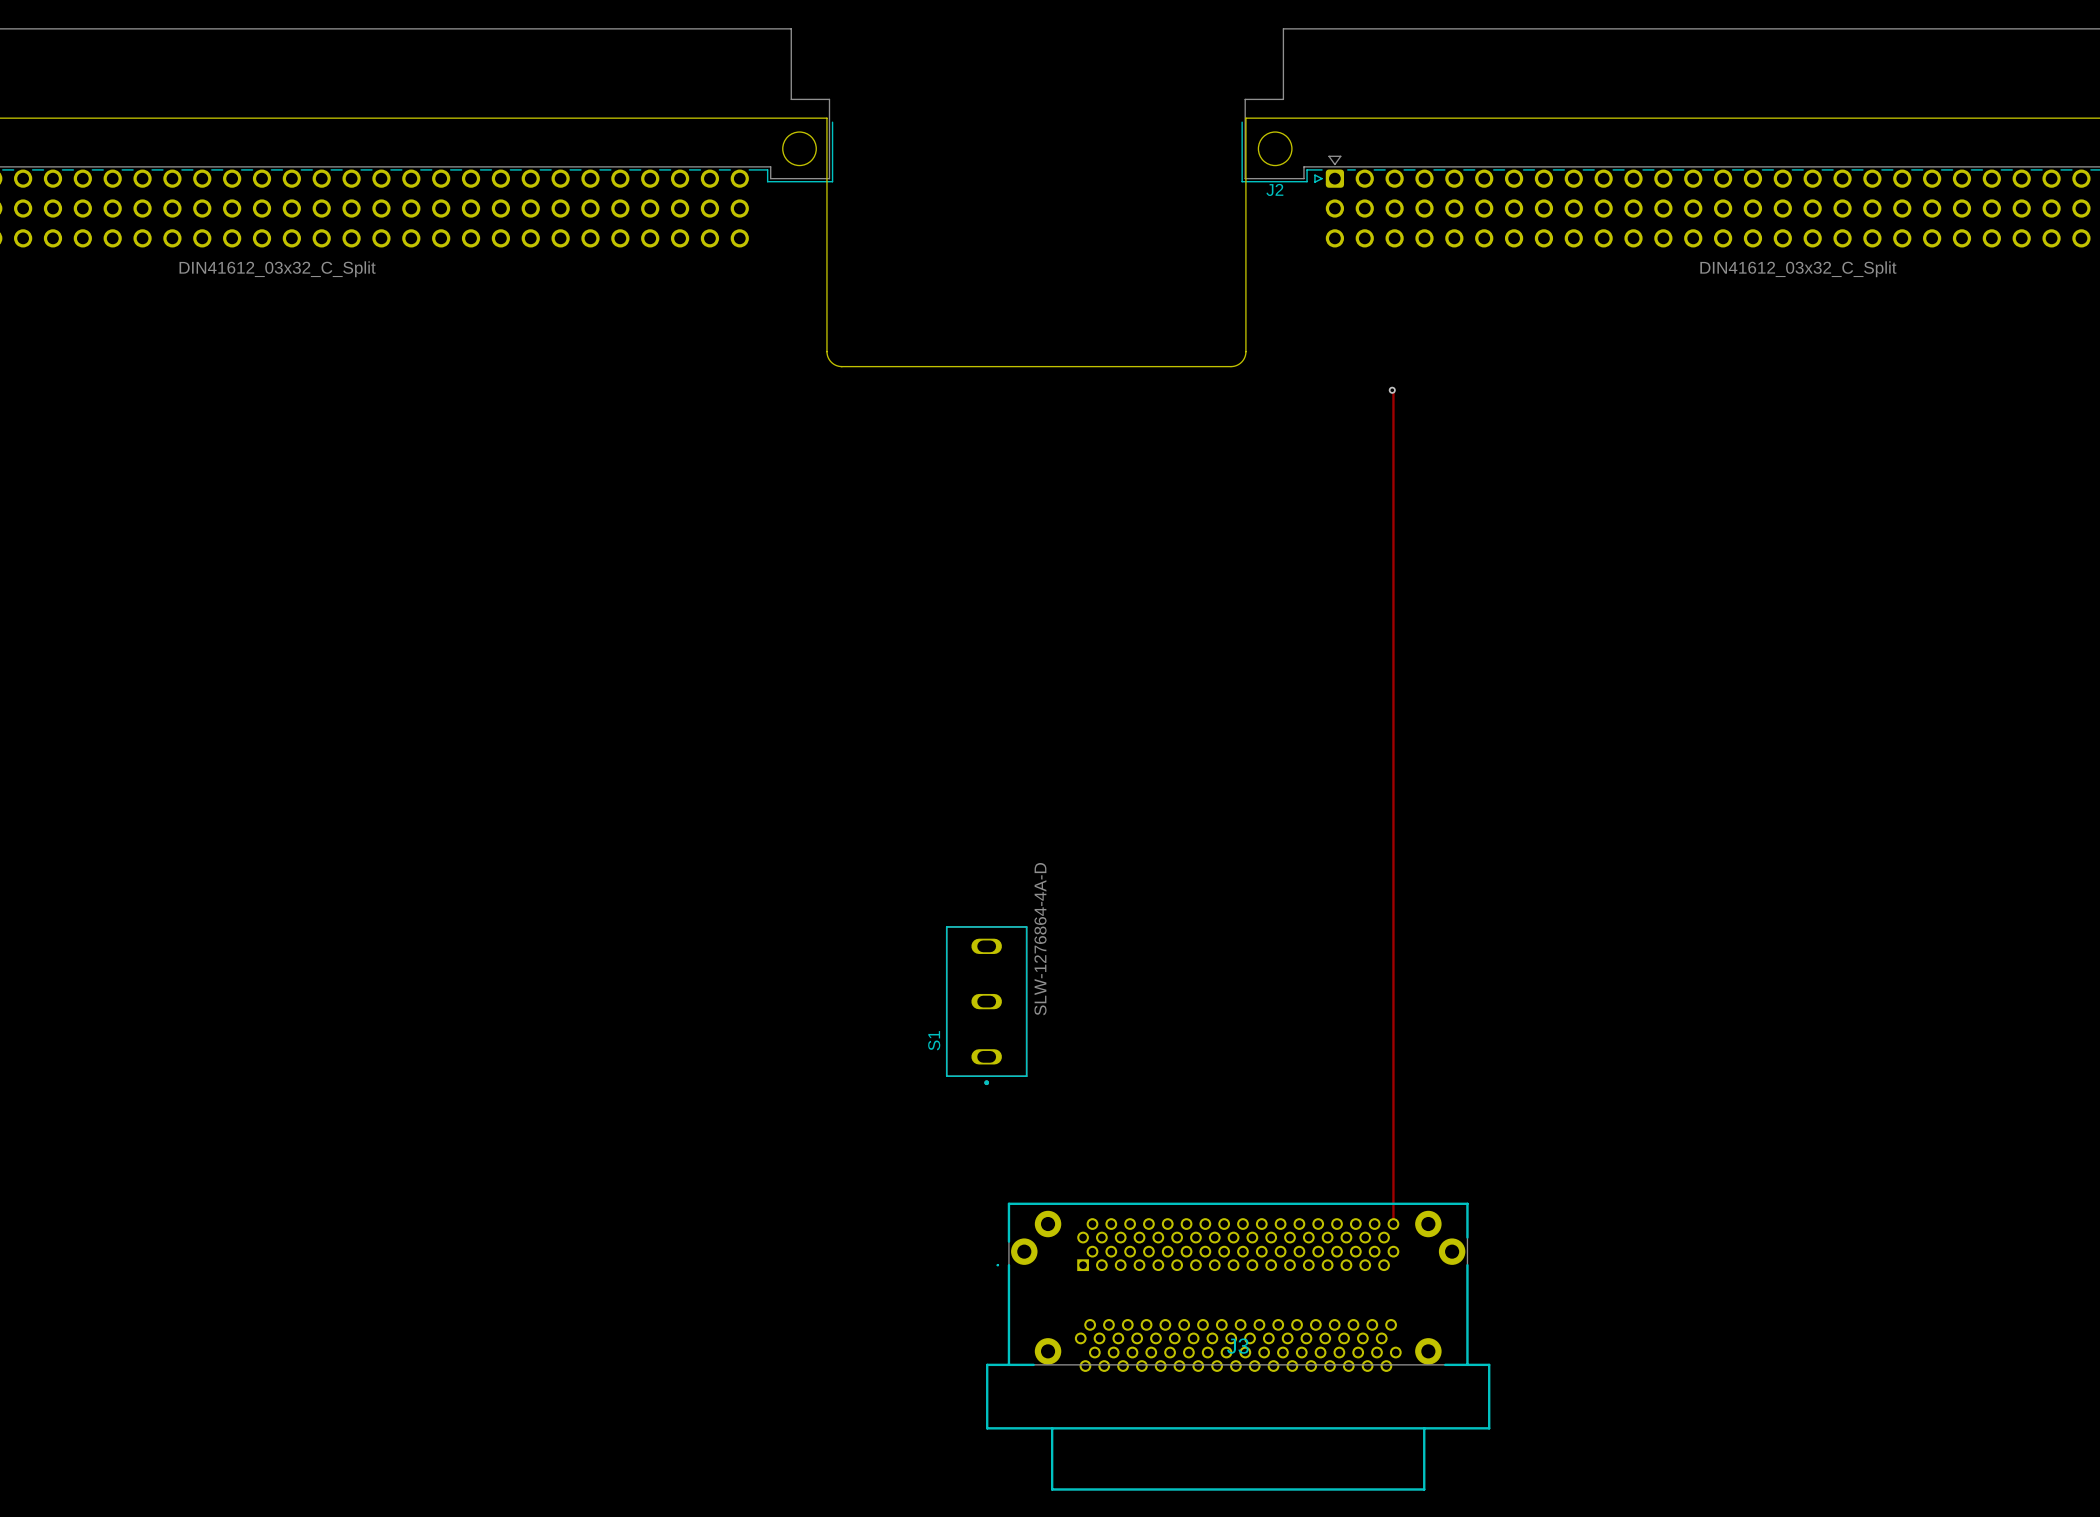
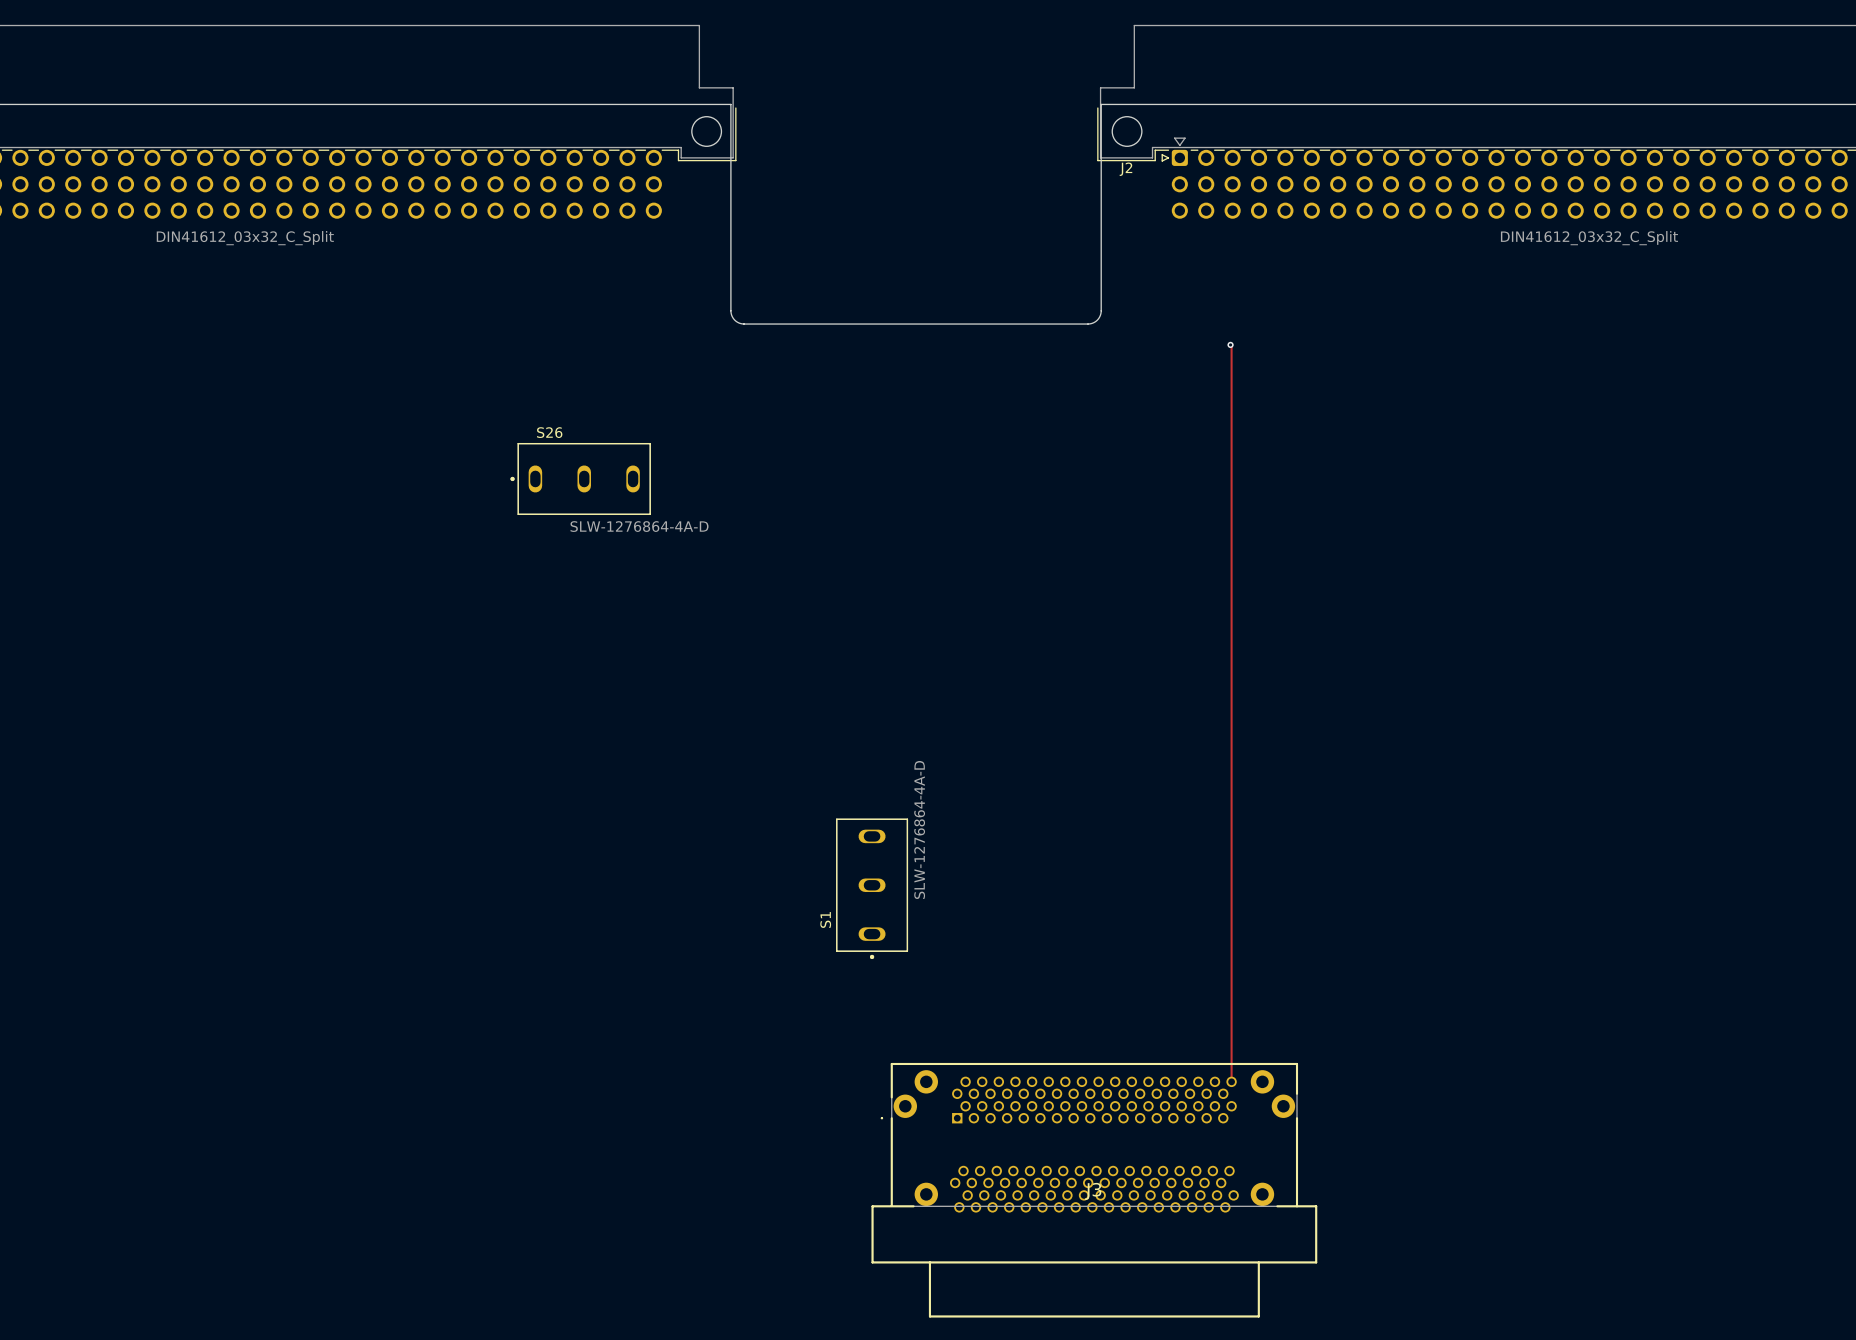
S26: none -> SLW-1276864-4A-D (580, 478)

